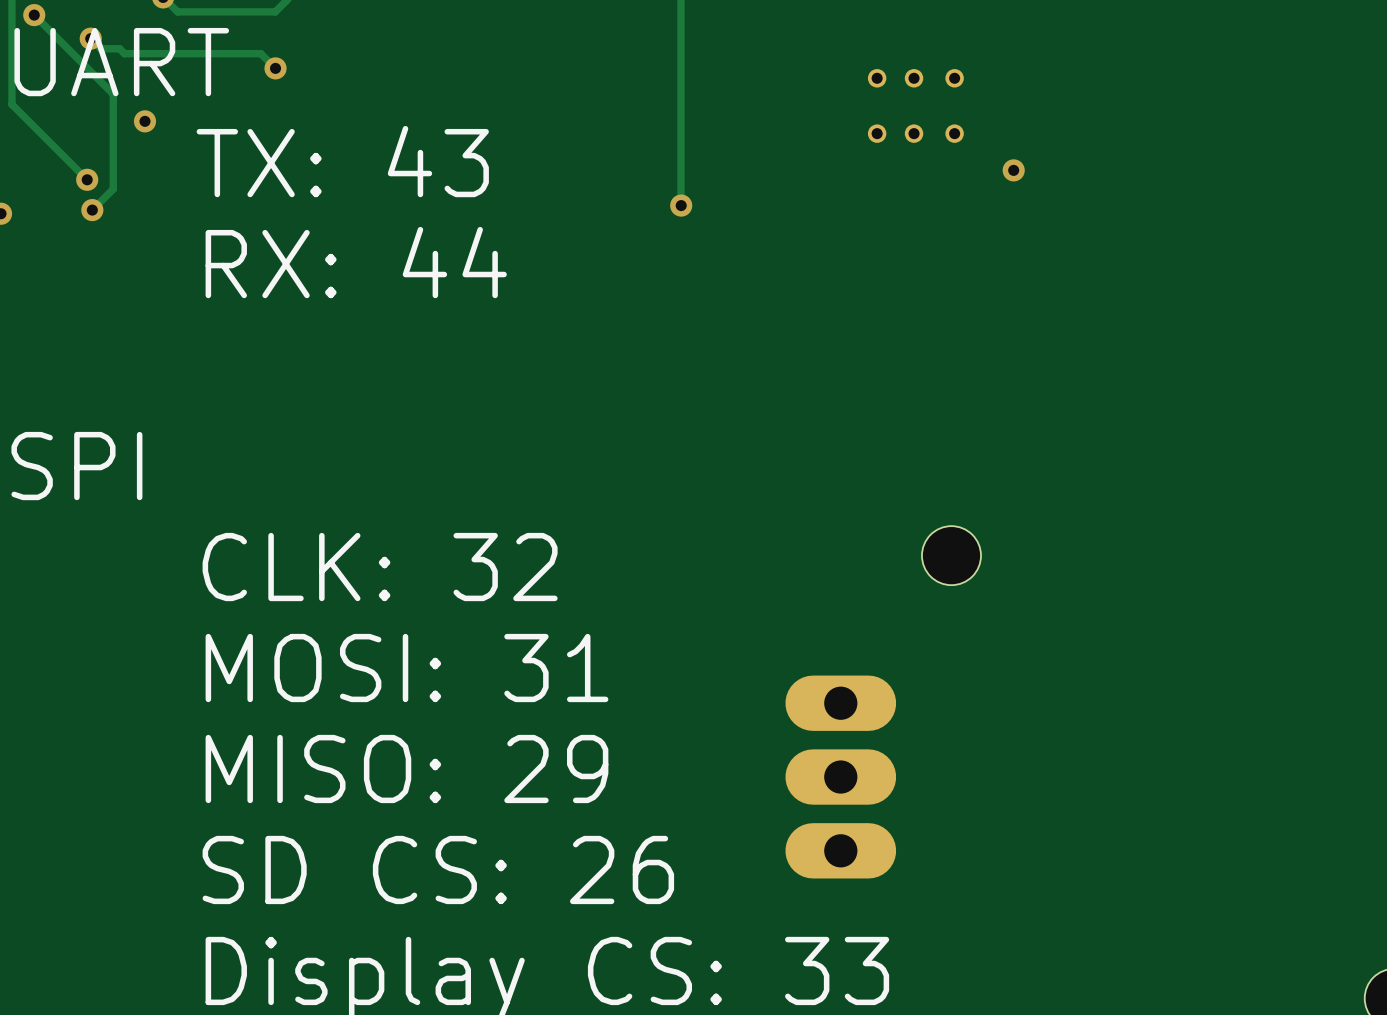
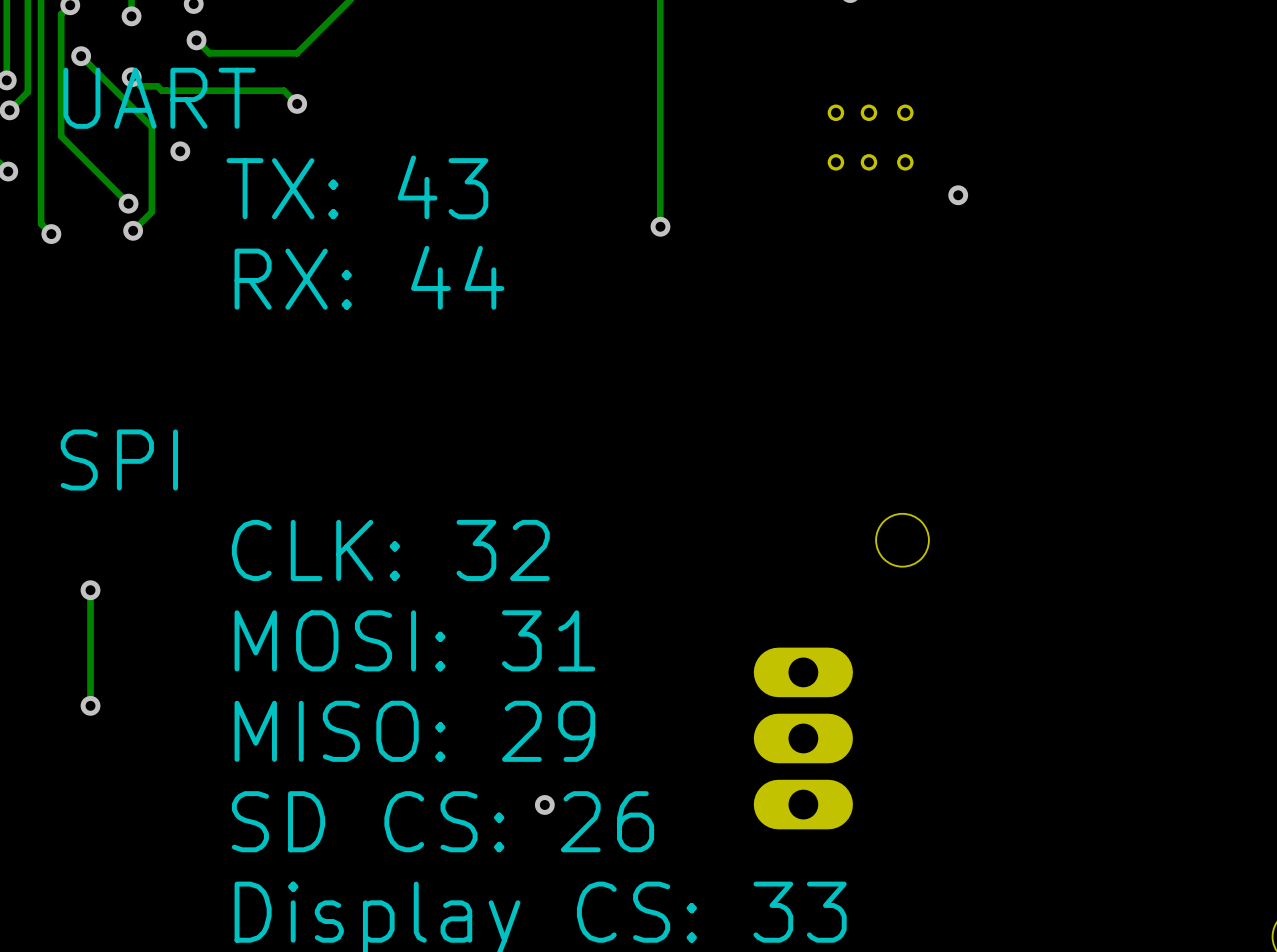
track: none -> (90, 590) (90, 705)
via: none -> (90, 590)
via: none -> (90, 705)
via: none -> (544, 804)

